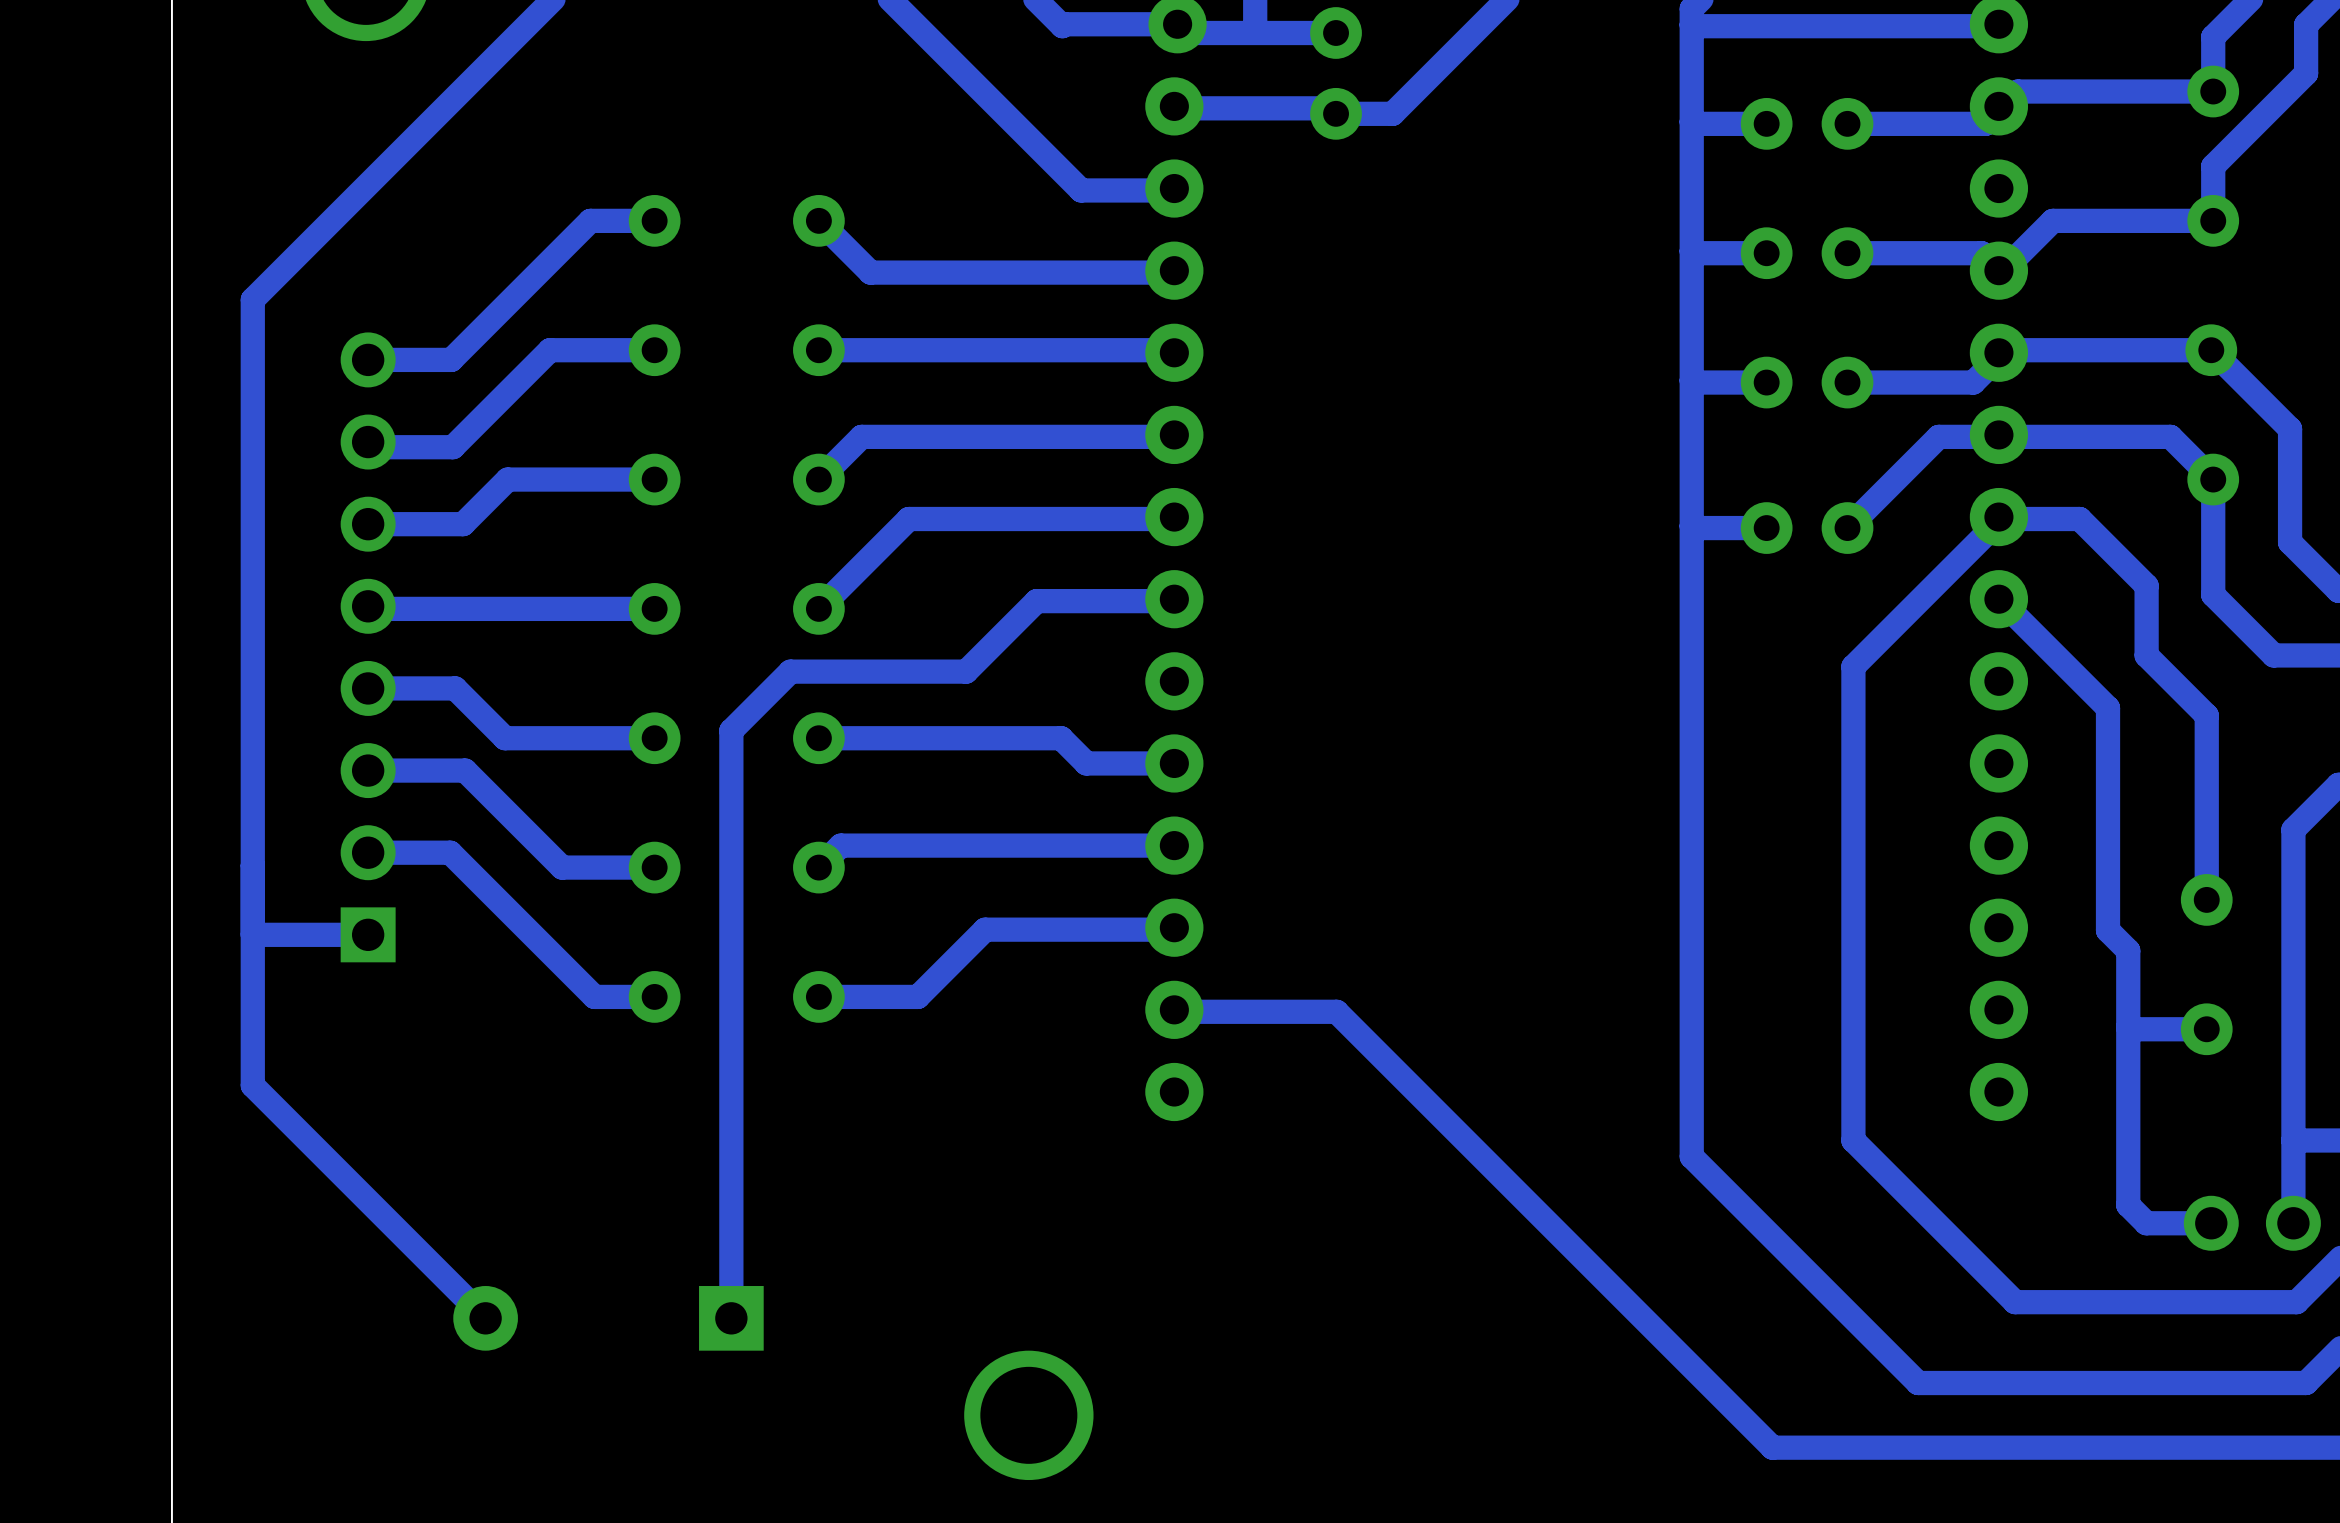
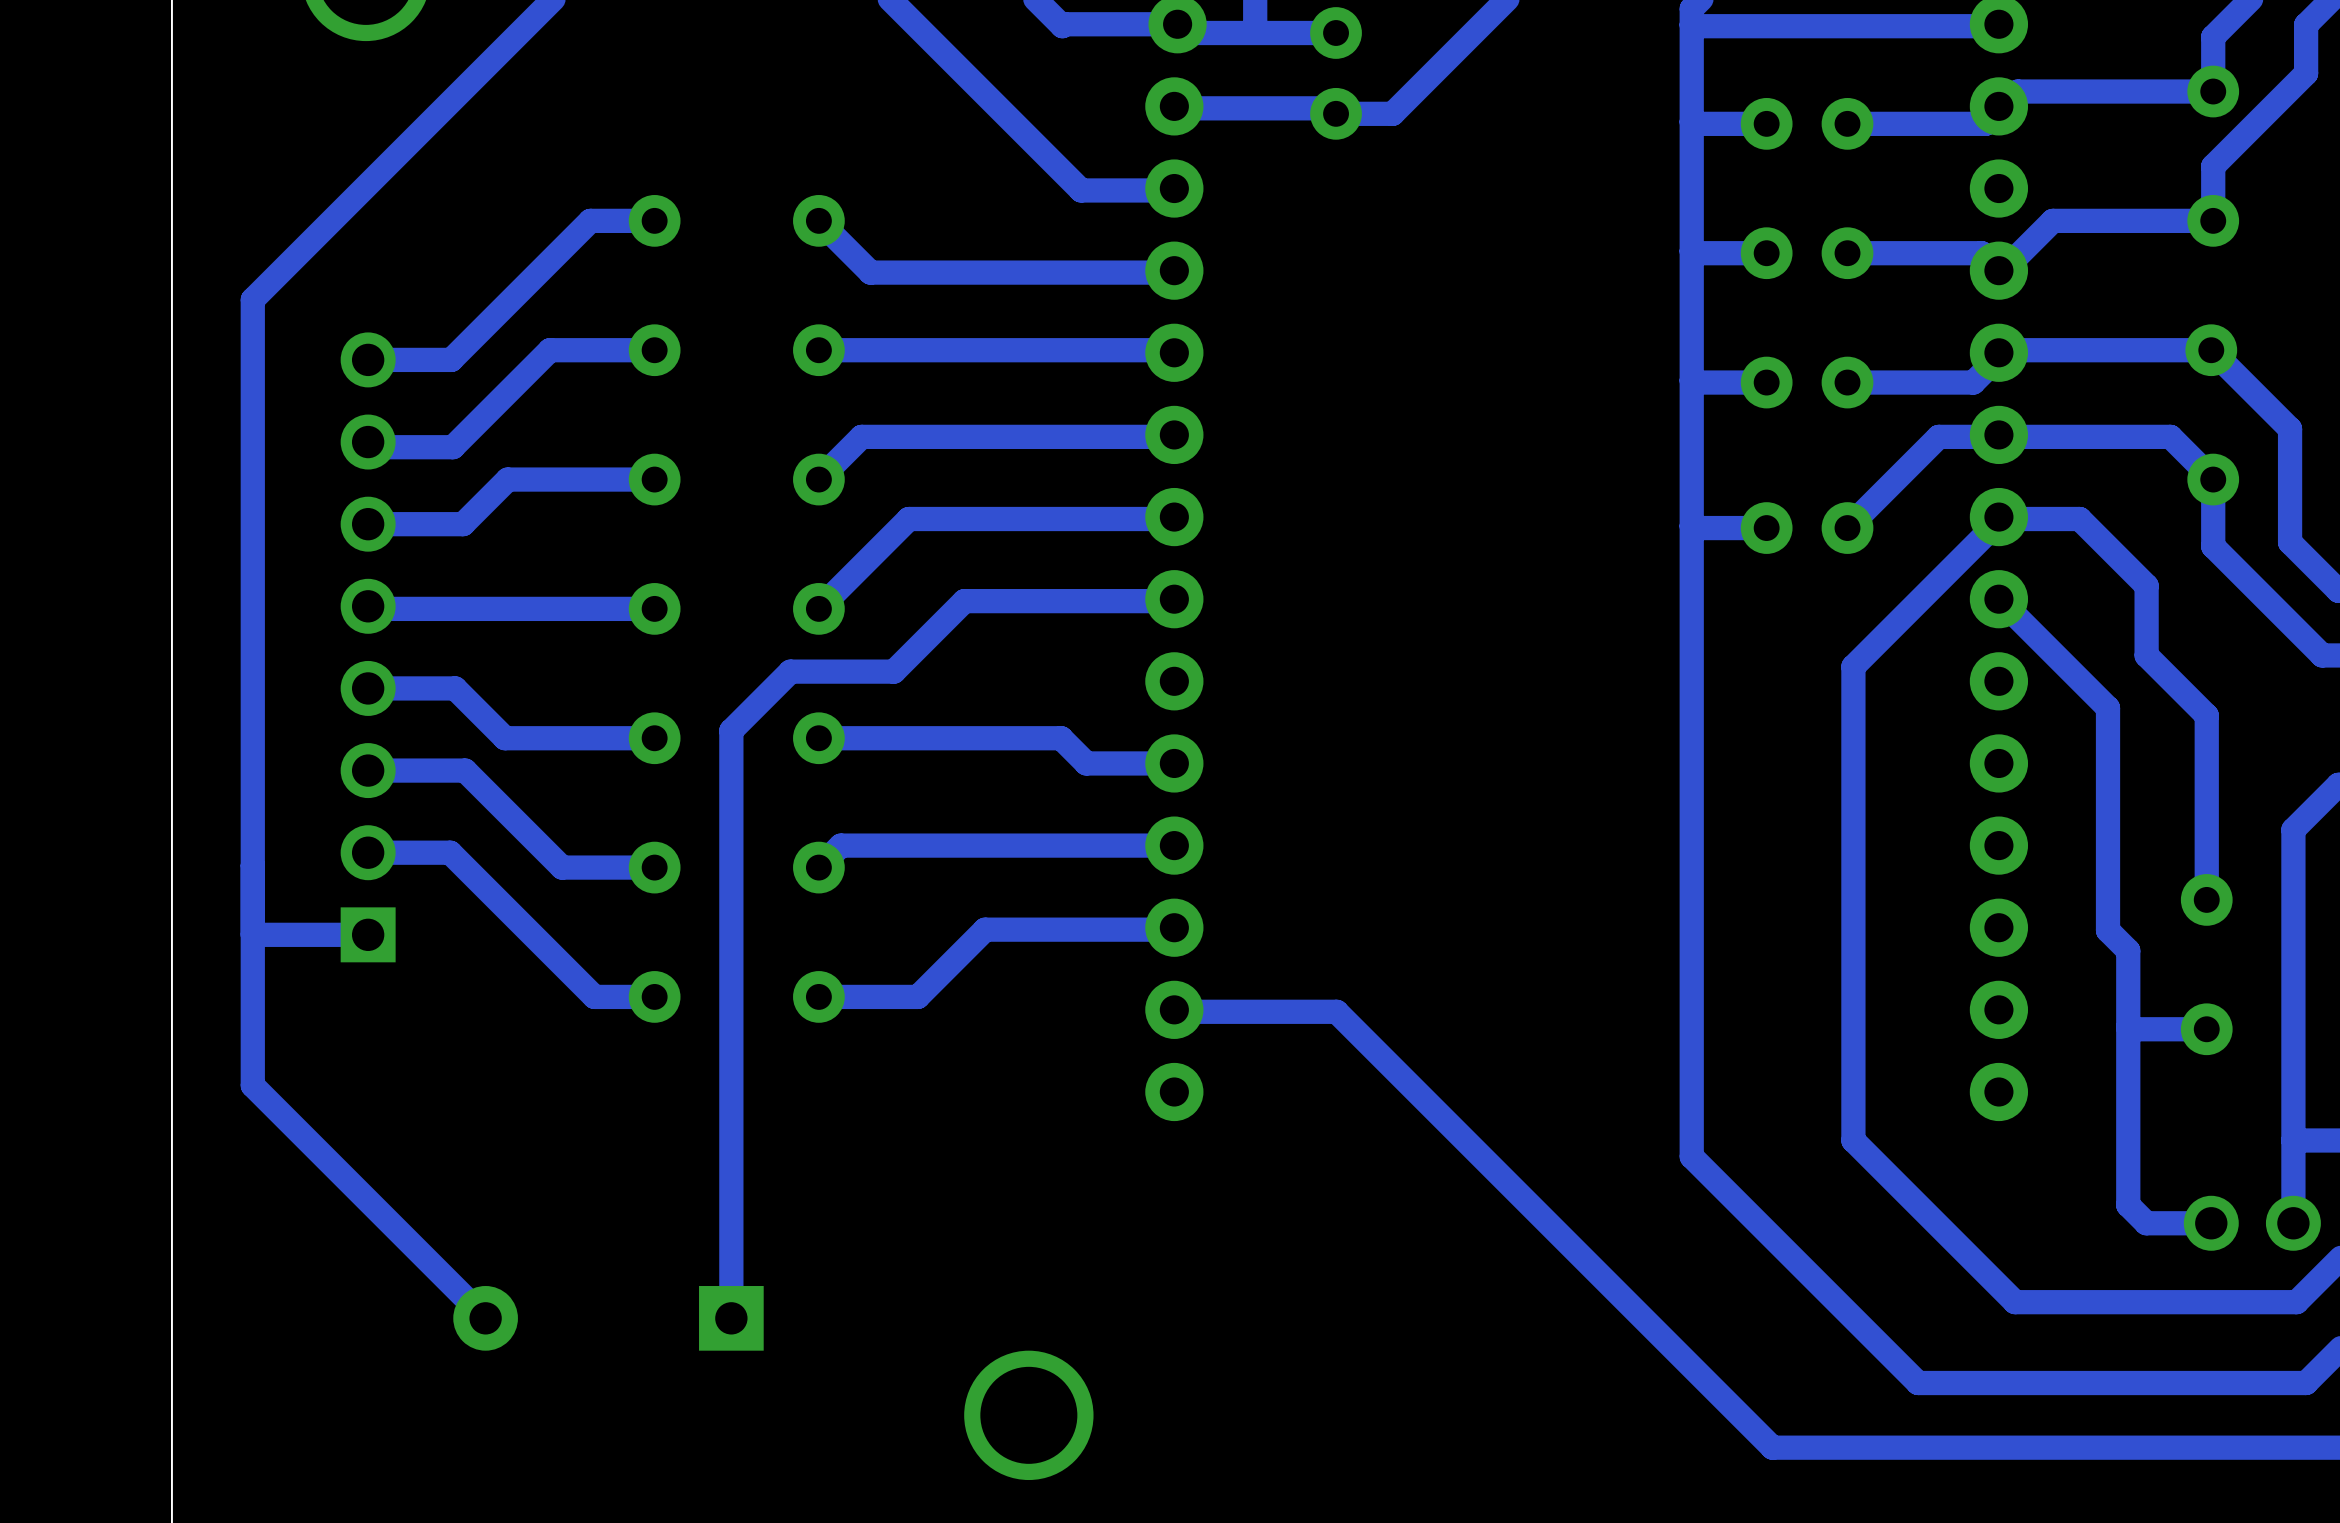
track: (2213, 546) (2213, 594) (2273, 655) (2322, 655) -> (2213, 546) (2322, 655)
track: (1036, 601) (966, 671) (893, 671) -> (1036, 601) (964, 601) (893, 671)

